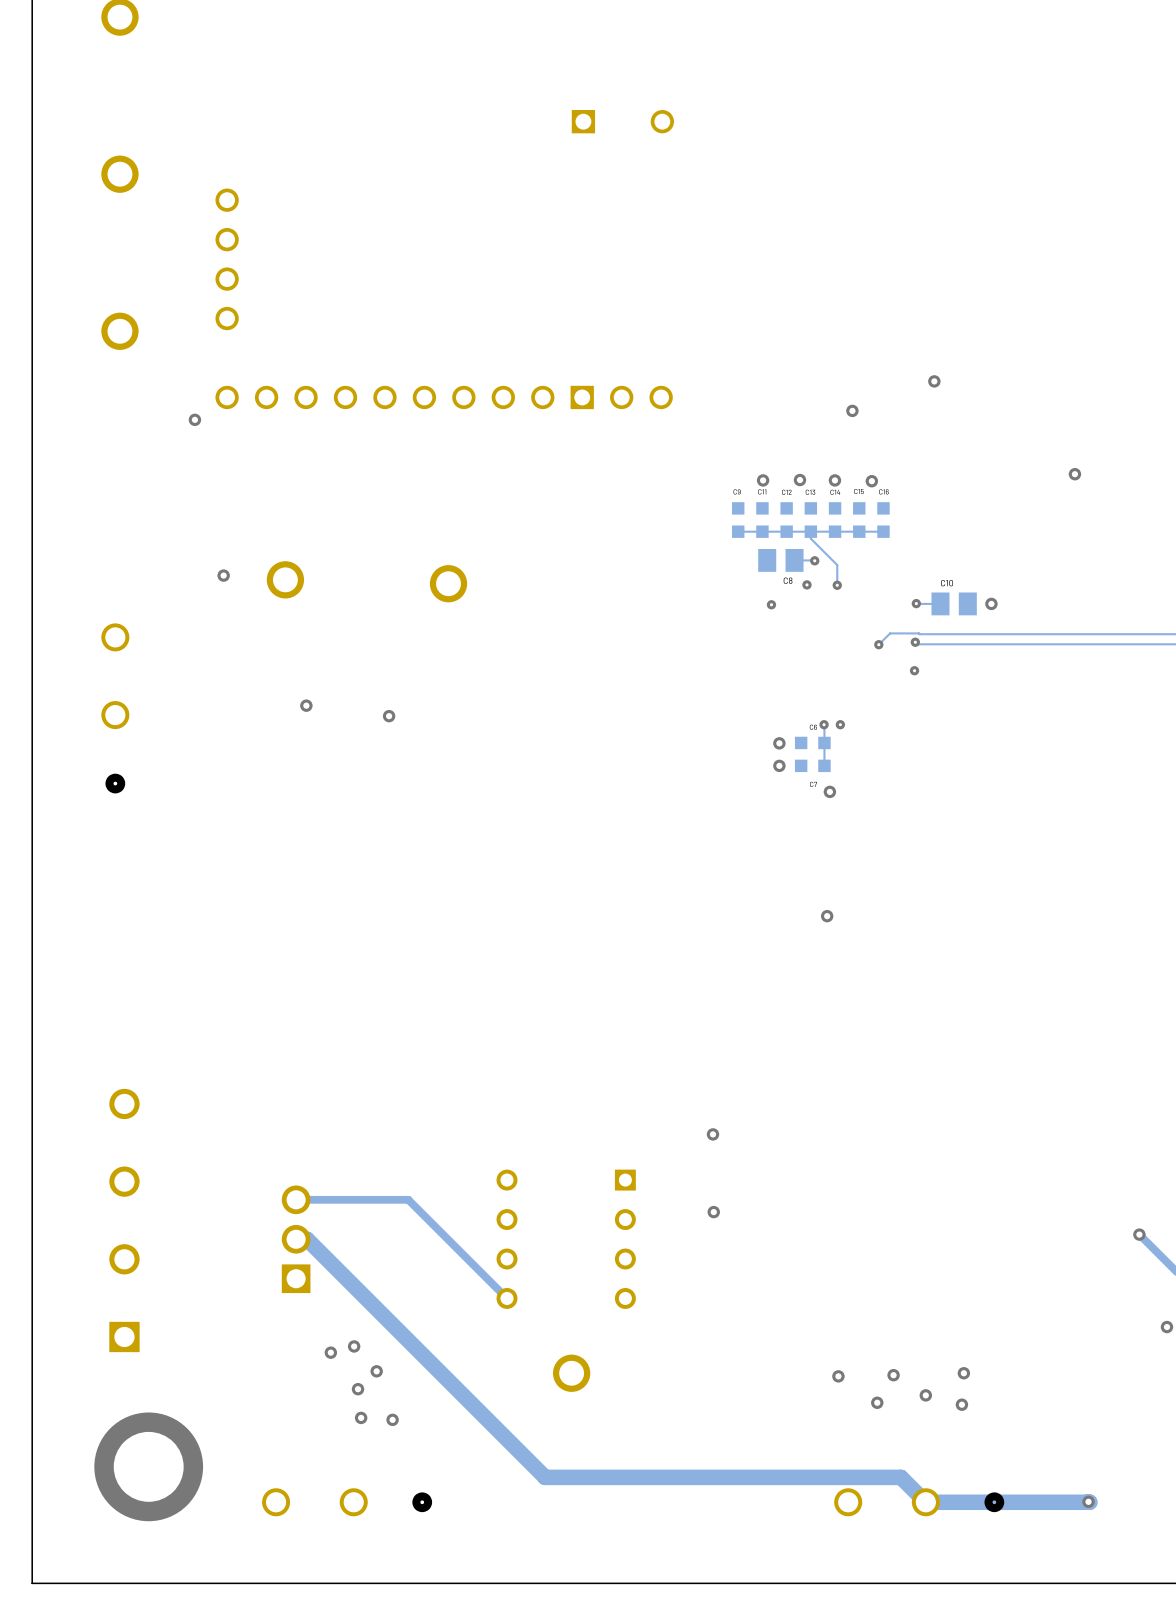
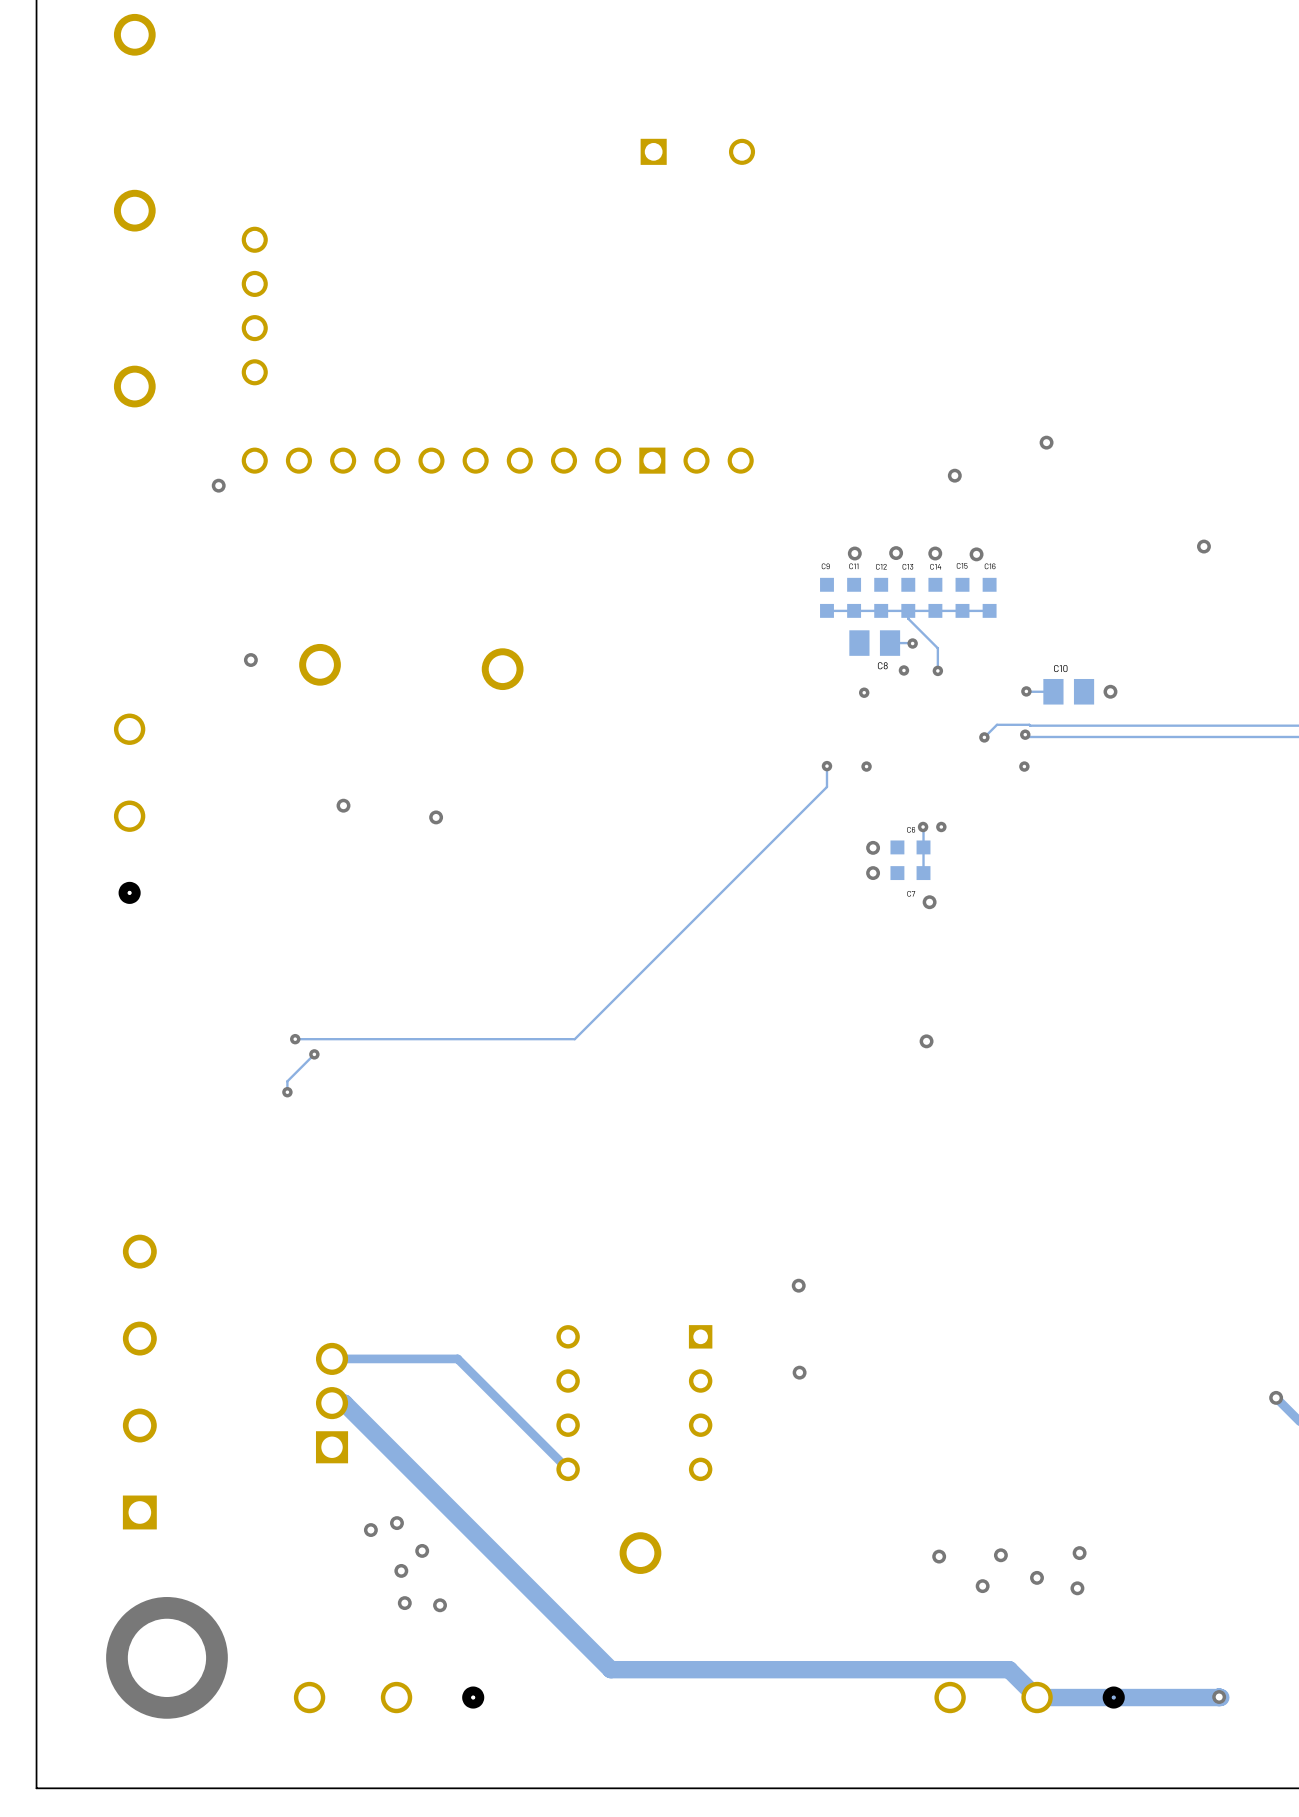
track: none -> (827, 765) (826, 786) (574, 1039) (295, 1039)
via: none -> (826, 766)
via: none -> (866, 766)
via: none -> (295, 1039)
track: none -> (314, 1054) (287, 1081) (287, 1092)
via: none -> (314, 1054)
via: none -> (287, 1092)

